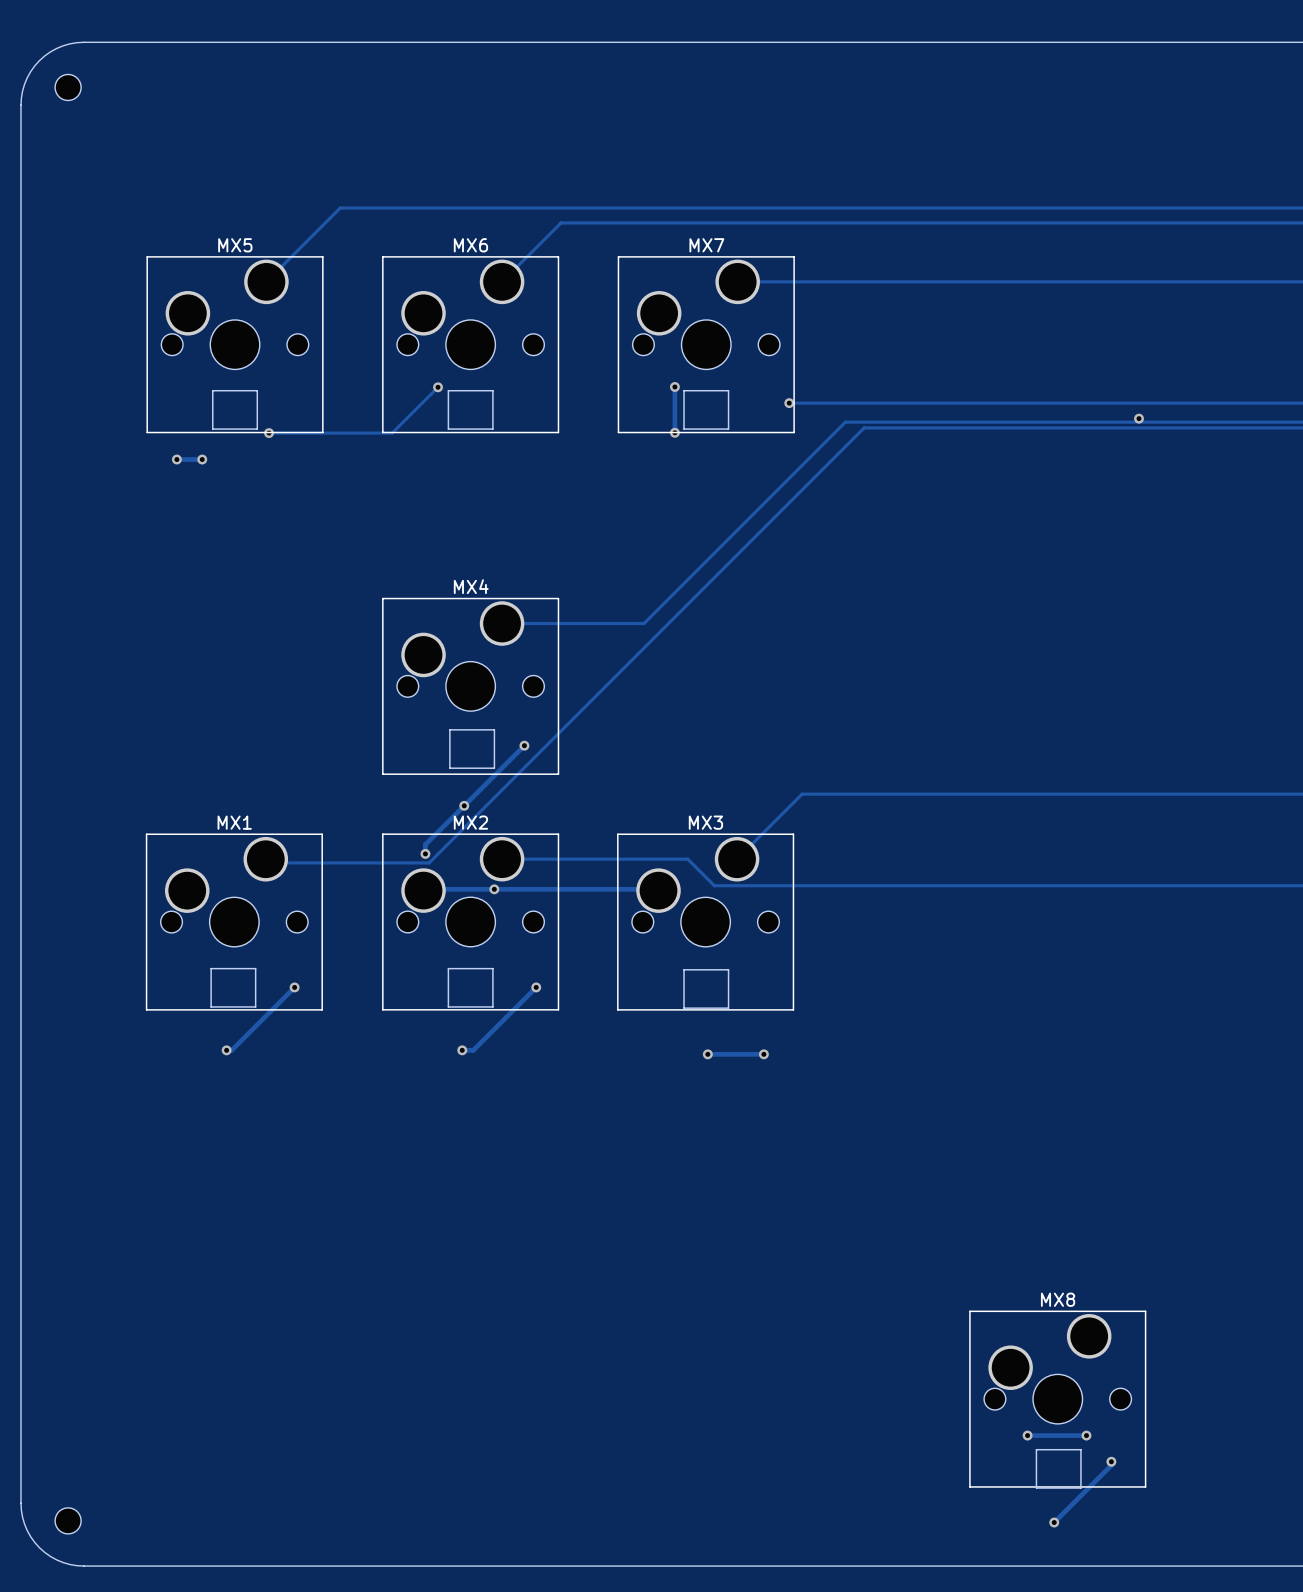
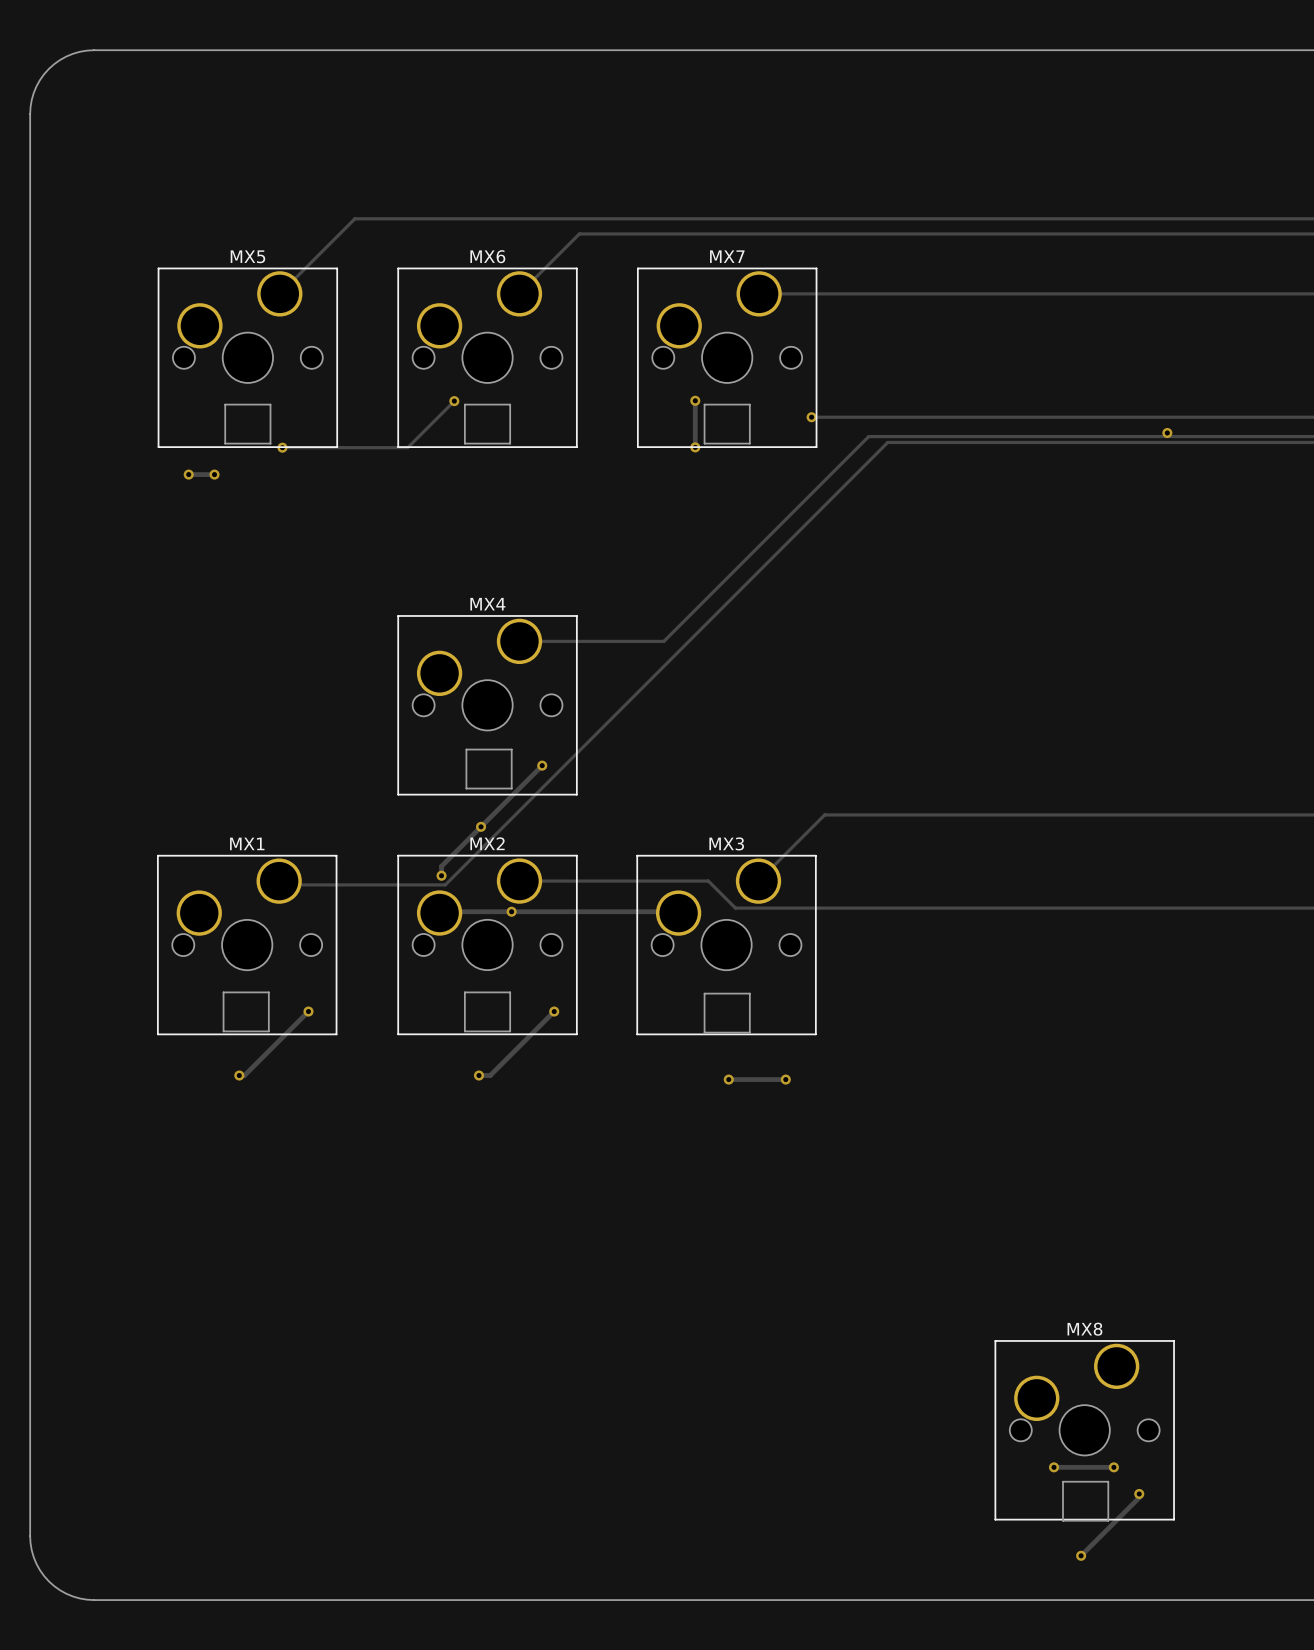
part: (68, 87) -> none
part: (68, 1520) -> none

